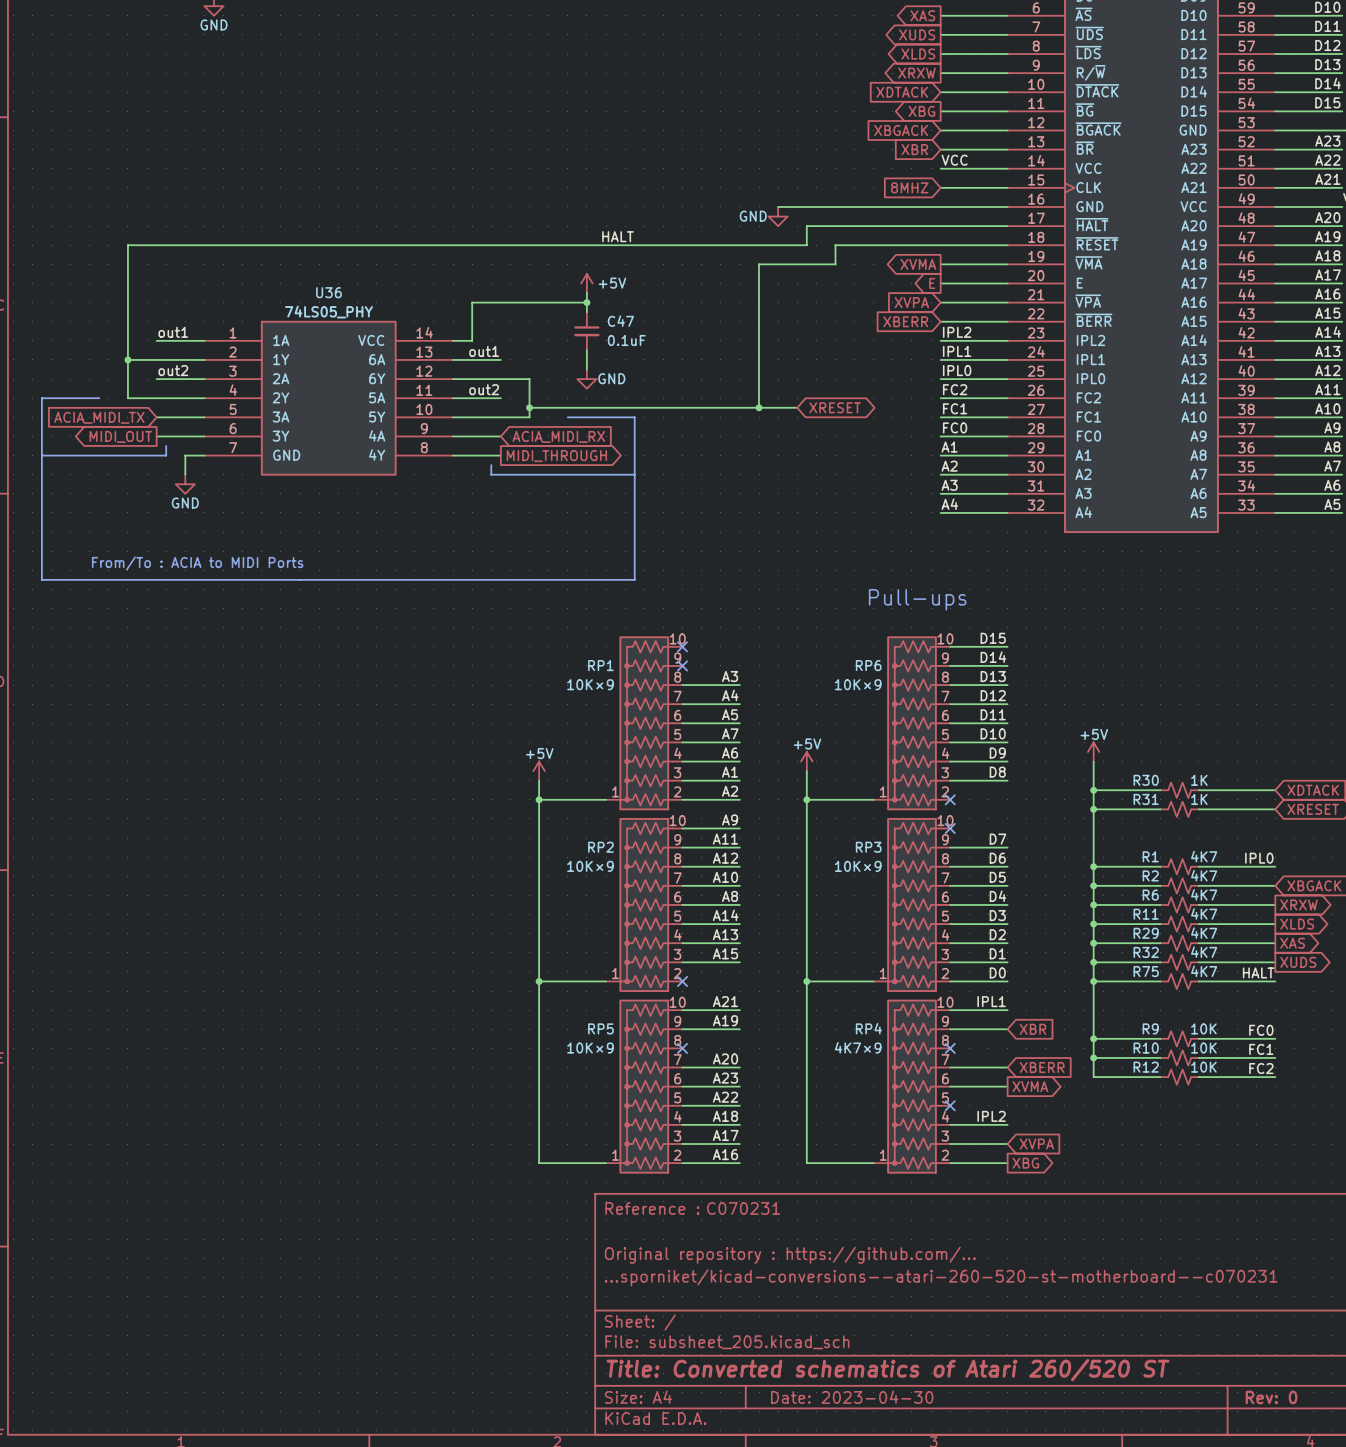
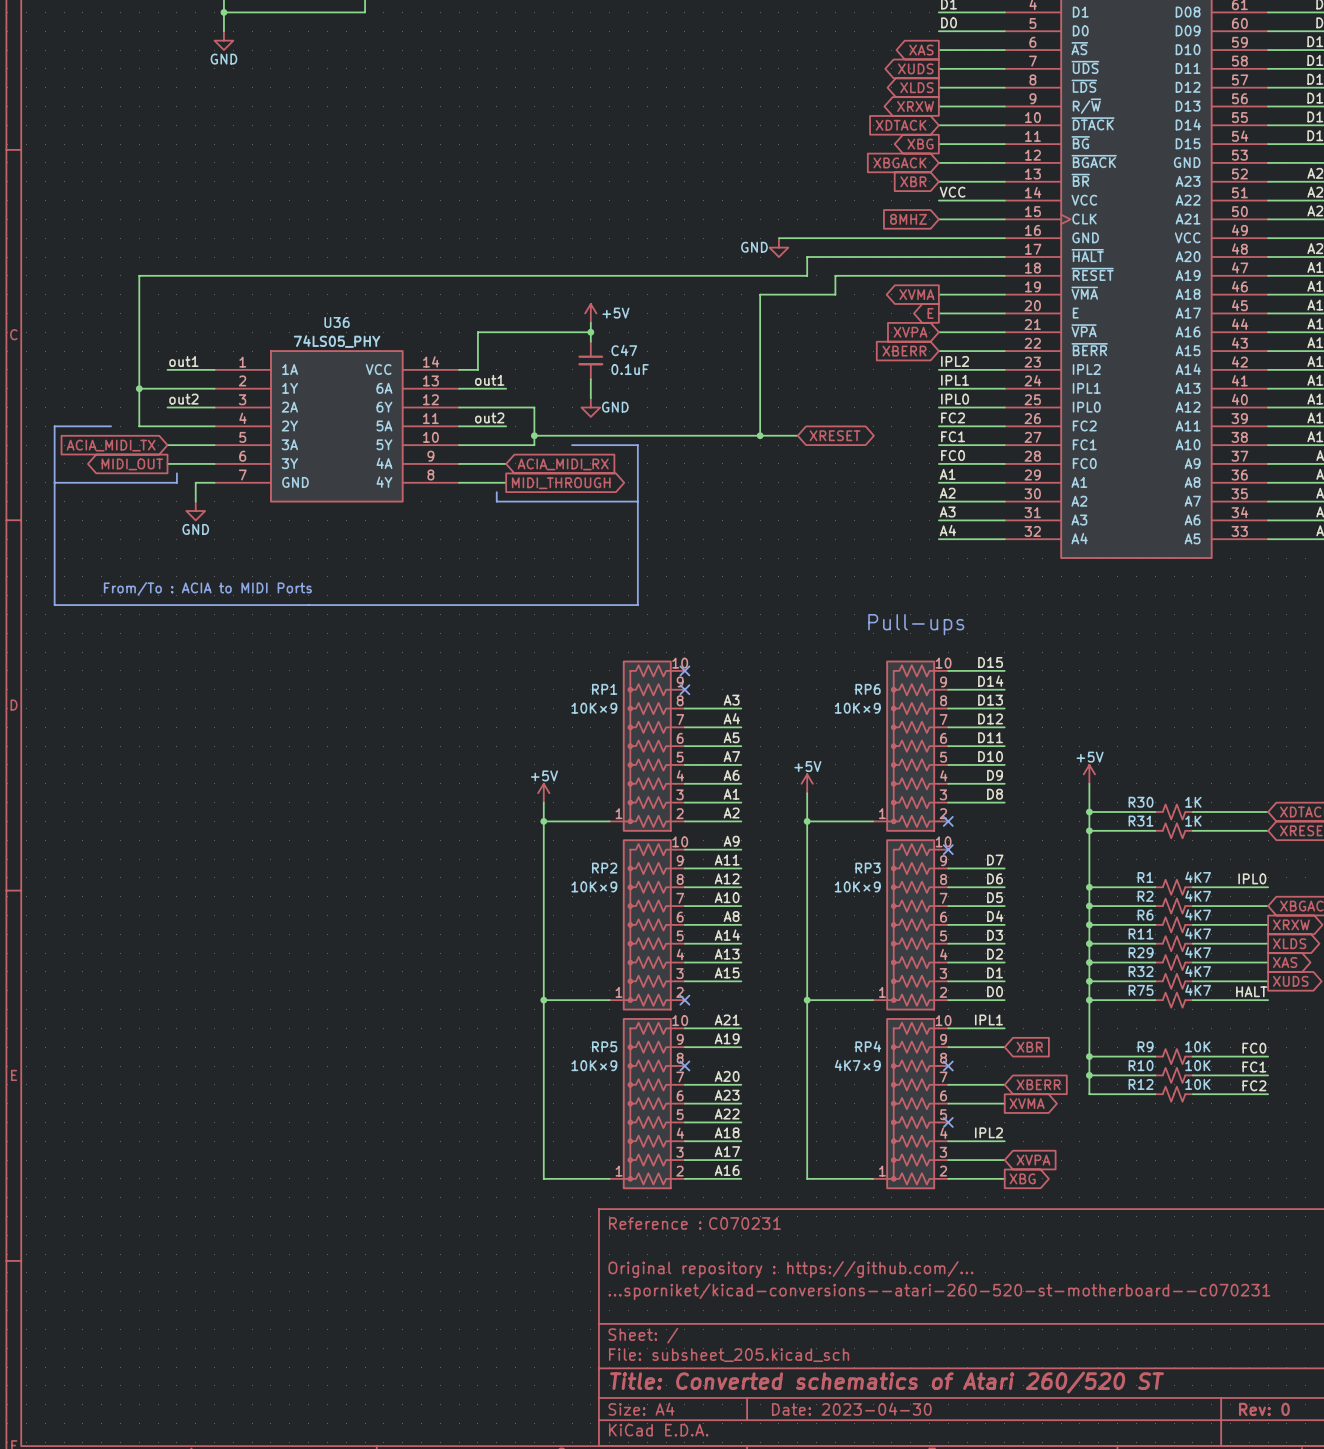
label: HALT (618, 236) -> none

